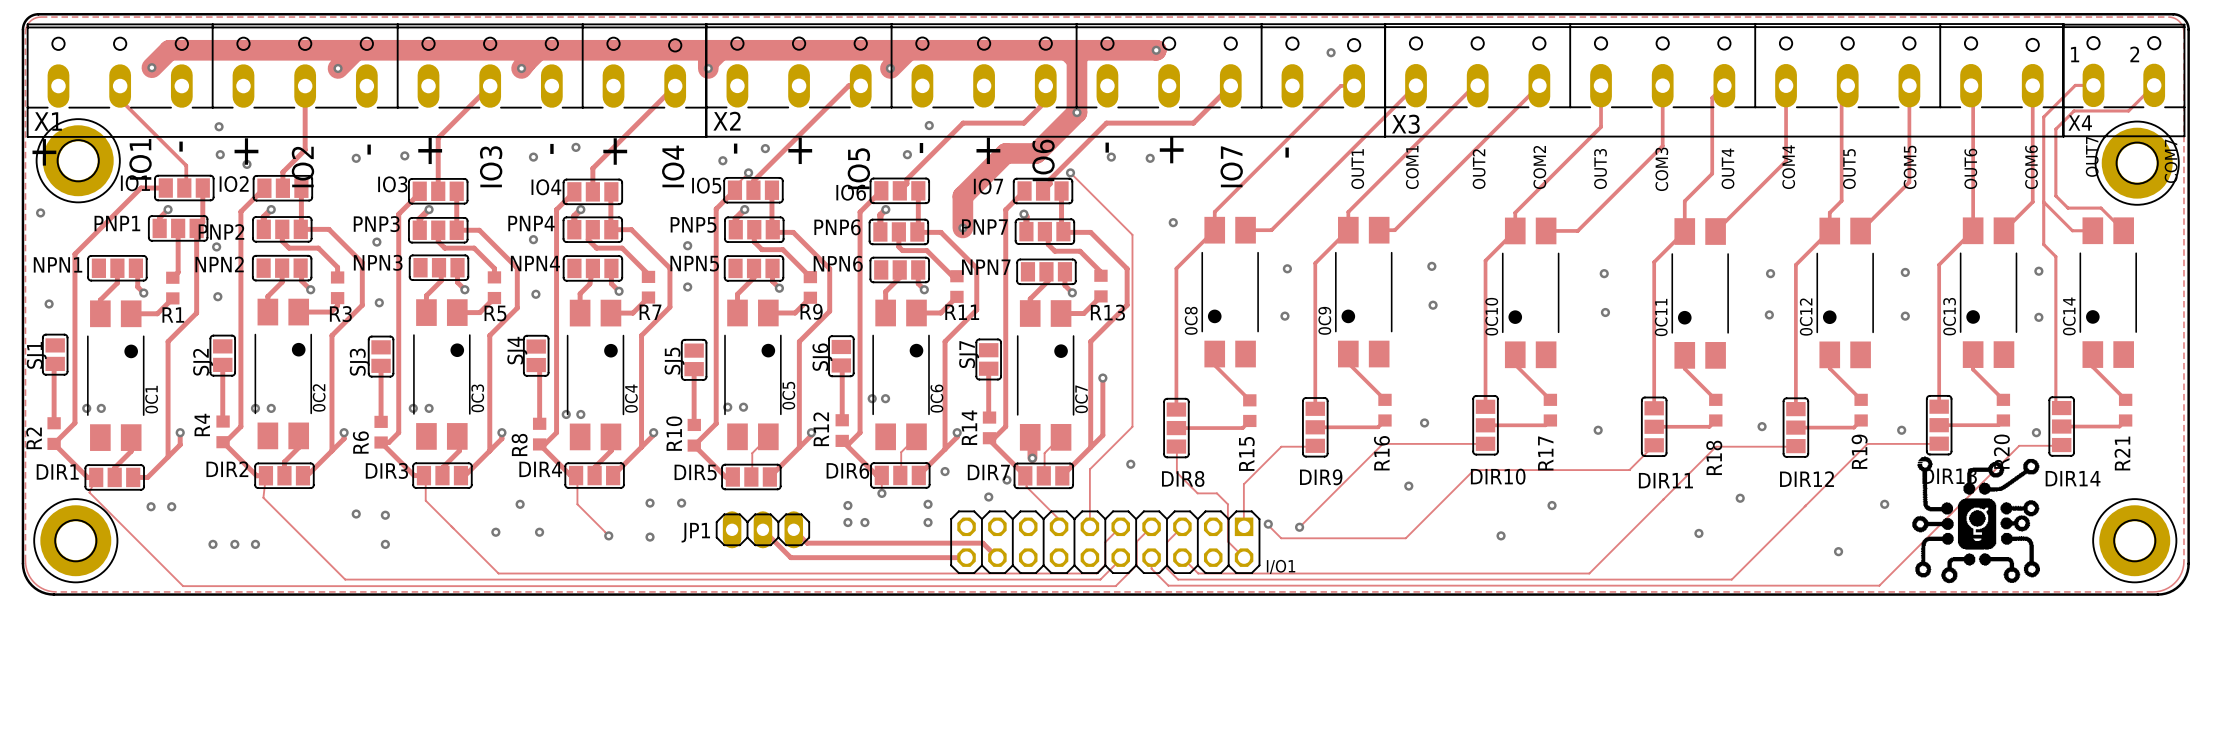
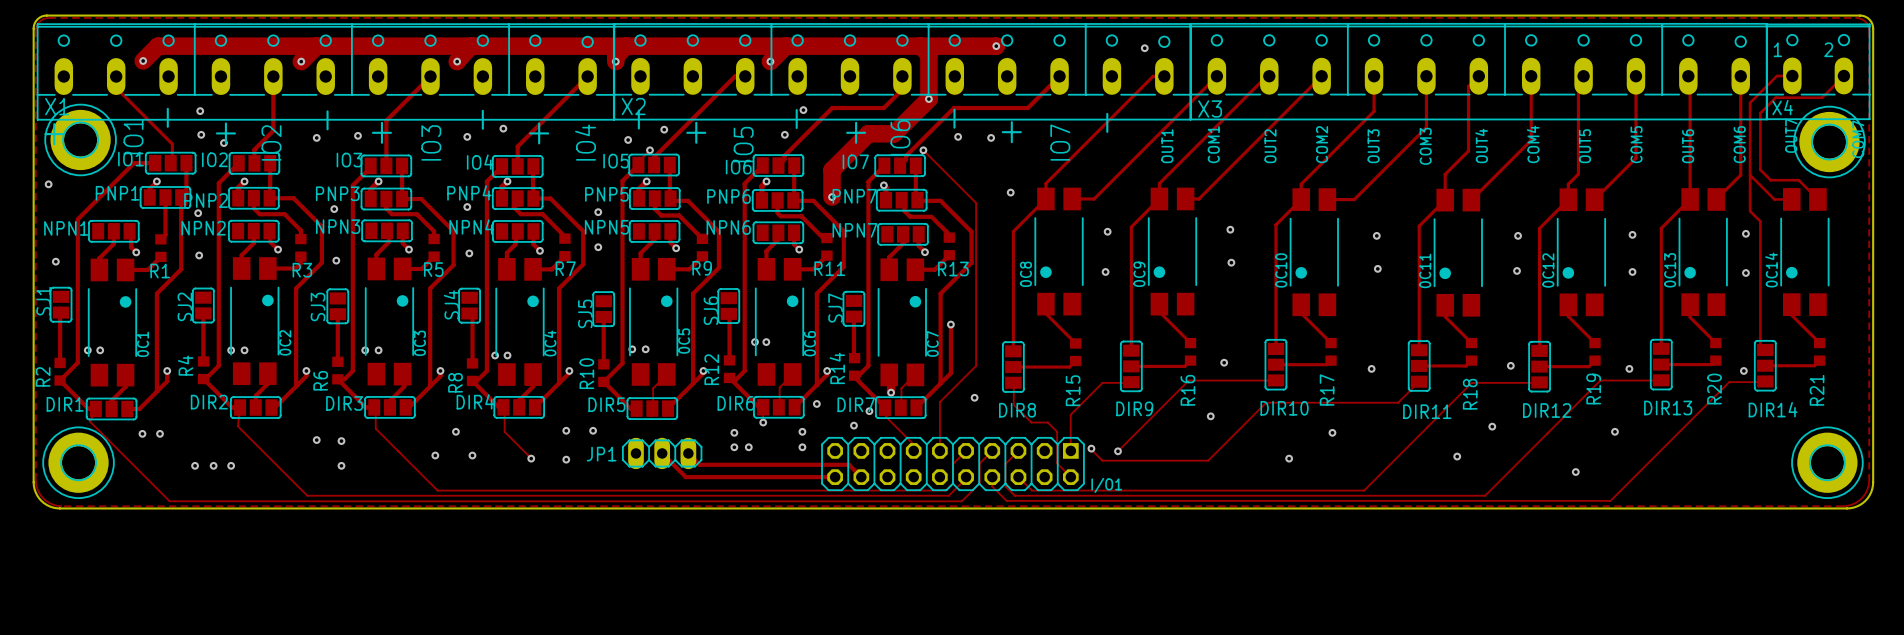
drawing: [1912, 456, 2040, 584] -> none

